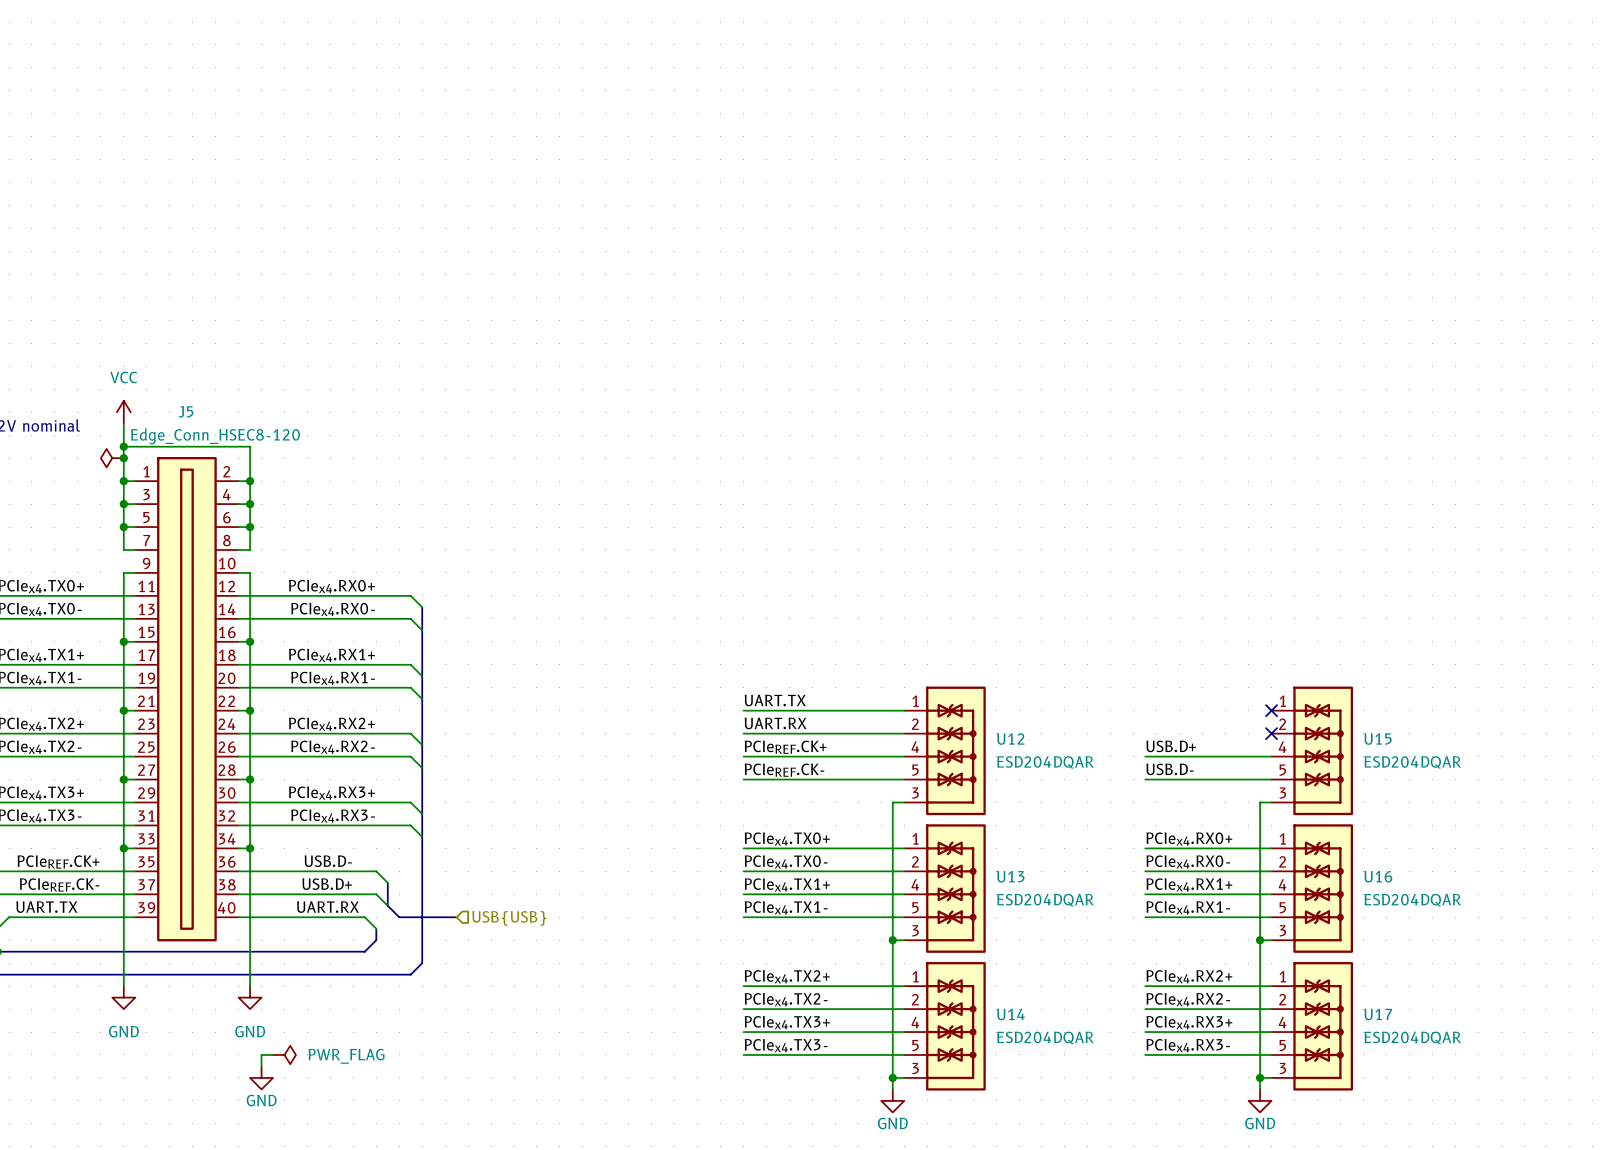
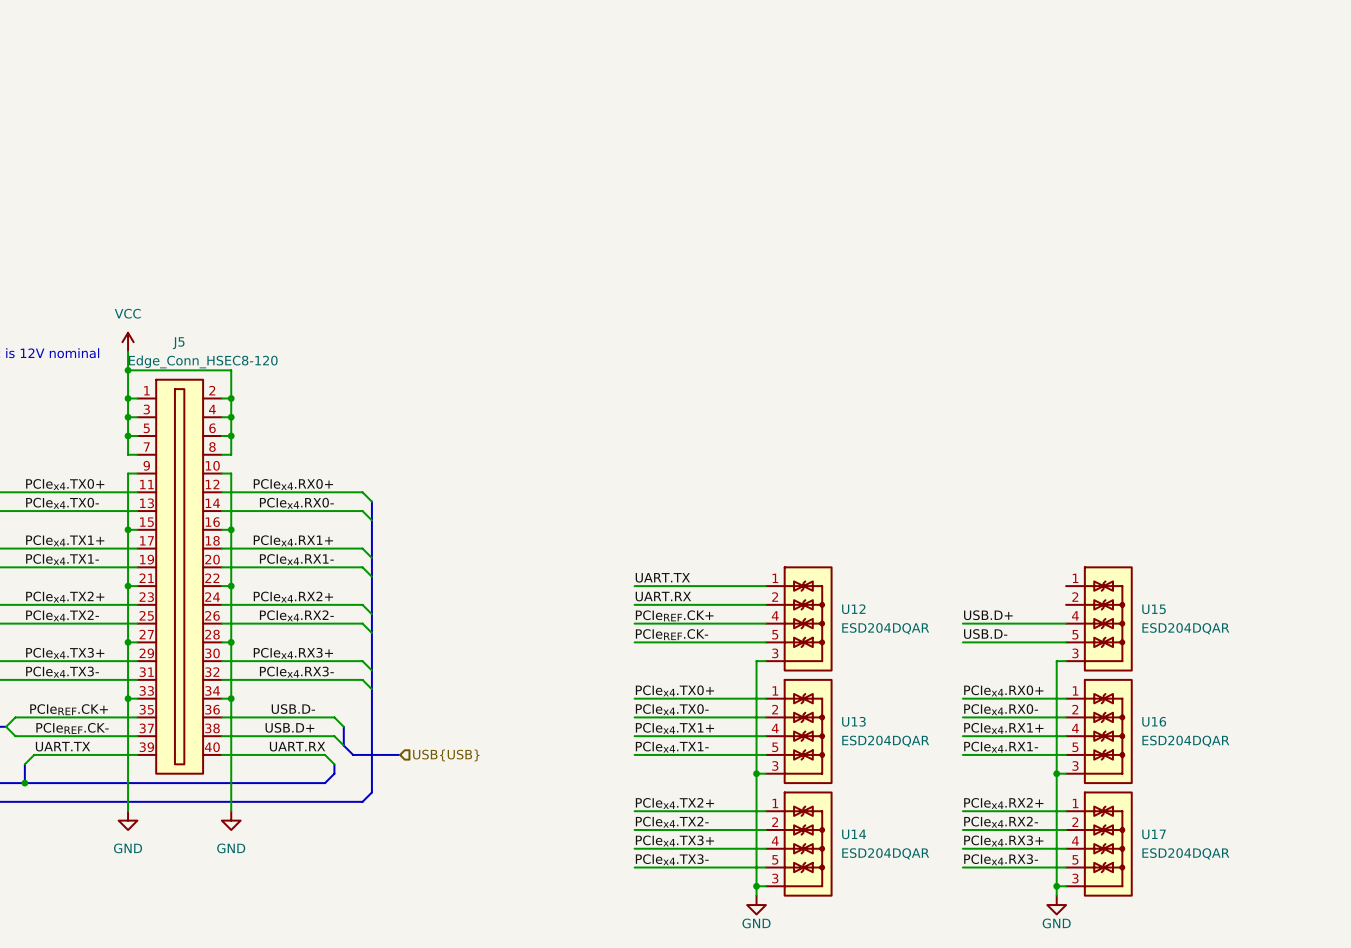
power symbol: (112, 458) -> none
junction: (123, 458) -> none
no-connect mark: (1271, 710) -> none
no-connect mark: (1271, 733) -> none
wire: (273, 1054) (261, 1054) (261, 1066) -> none
power symbol: PWR_FLAG (284, 1054) -> none
power symbol: GND (261, 1077) -> none

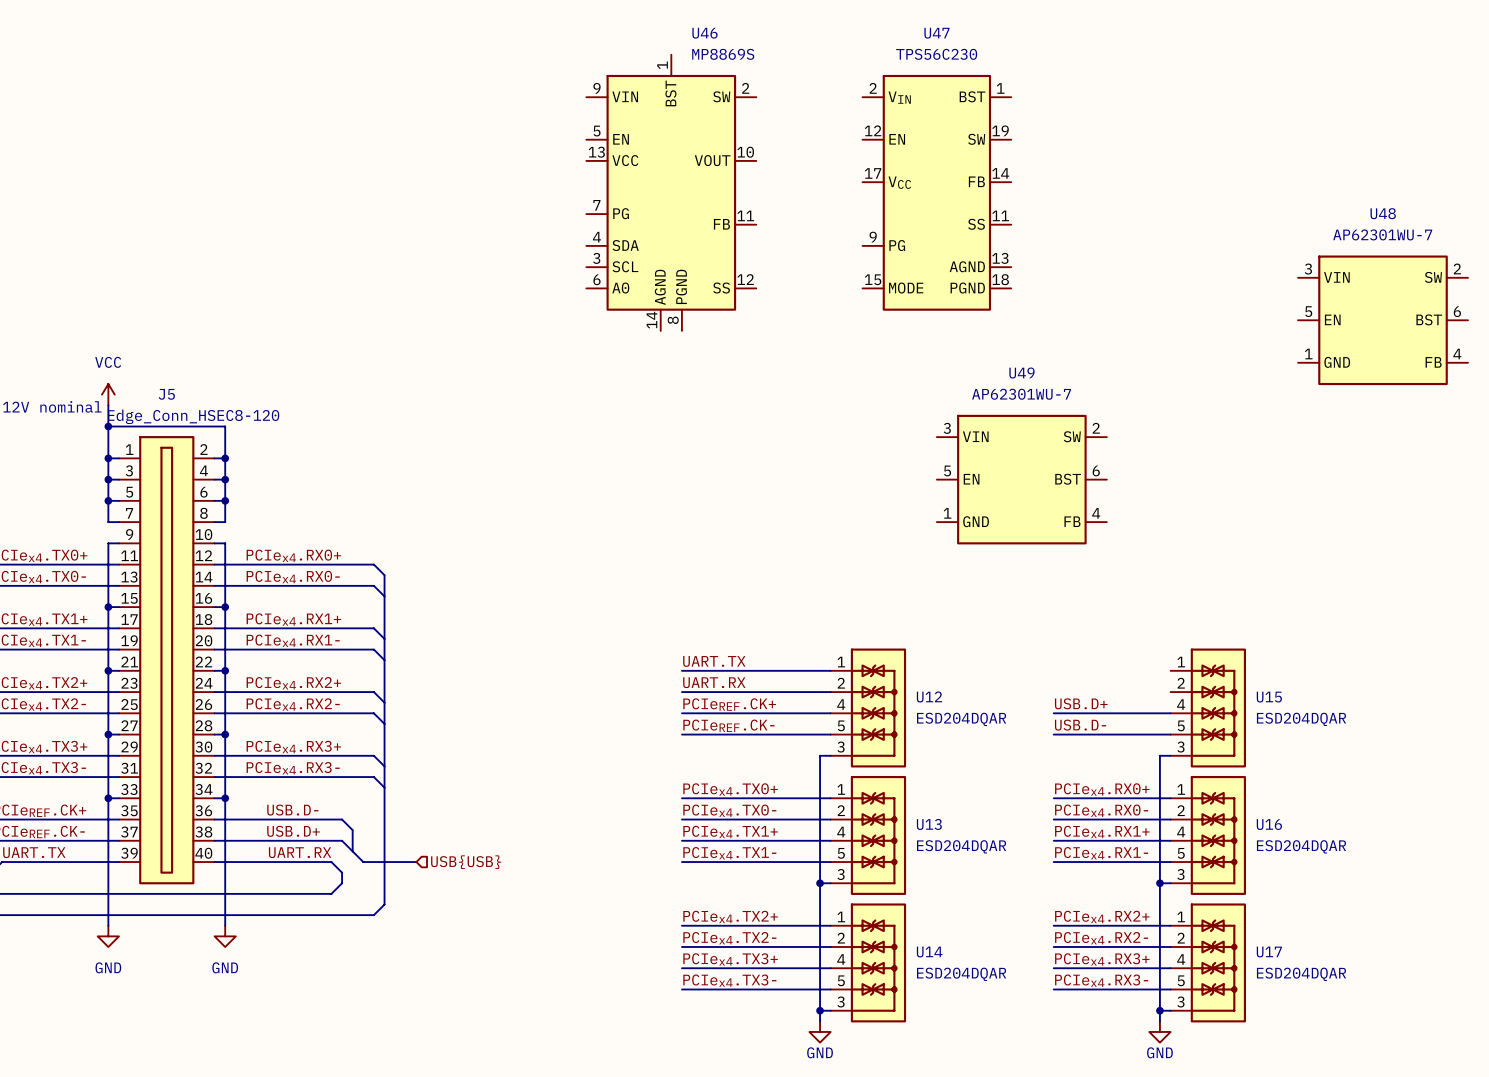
U46: none -> MP8869S (671, 192)
U47: none -> TPS56C230 (936, 192)
U48: none -> (1383, 320)
U49: none -> (1021, 479)

